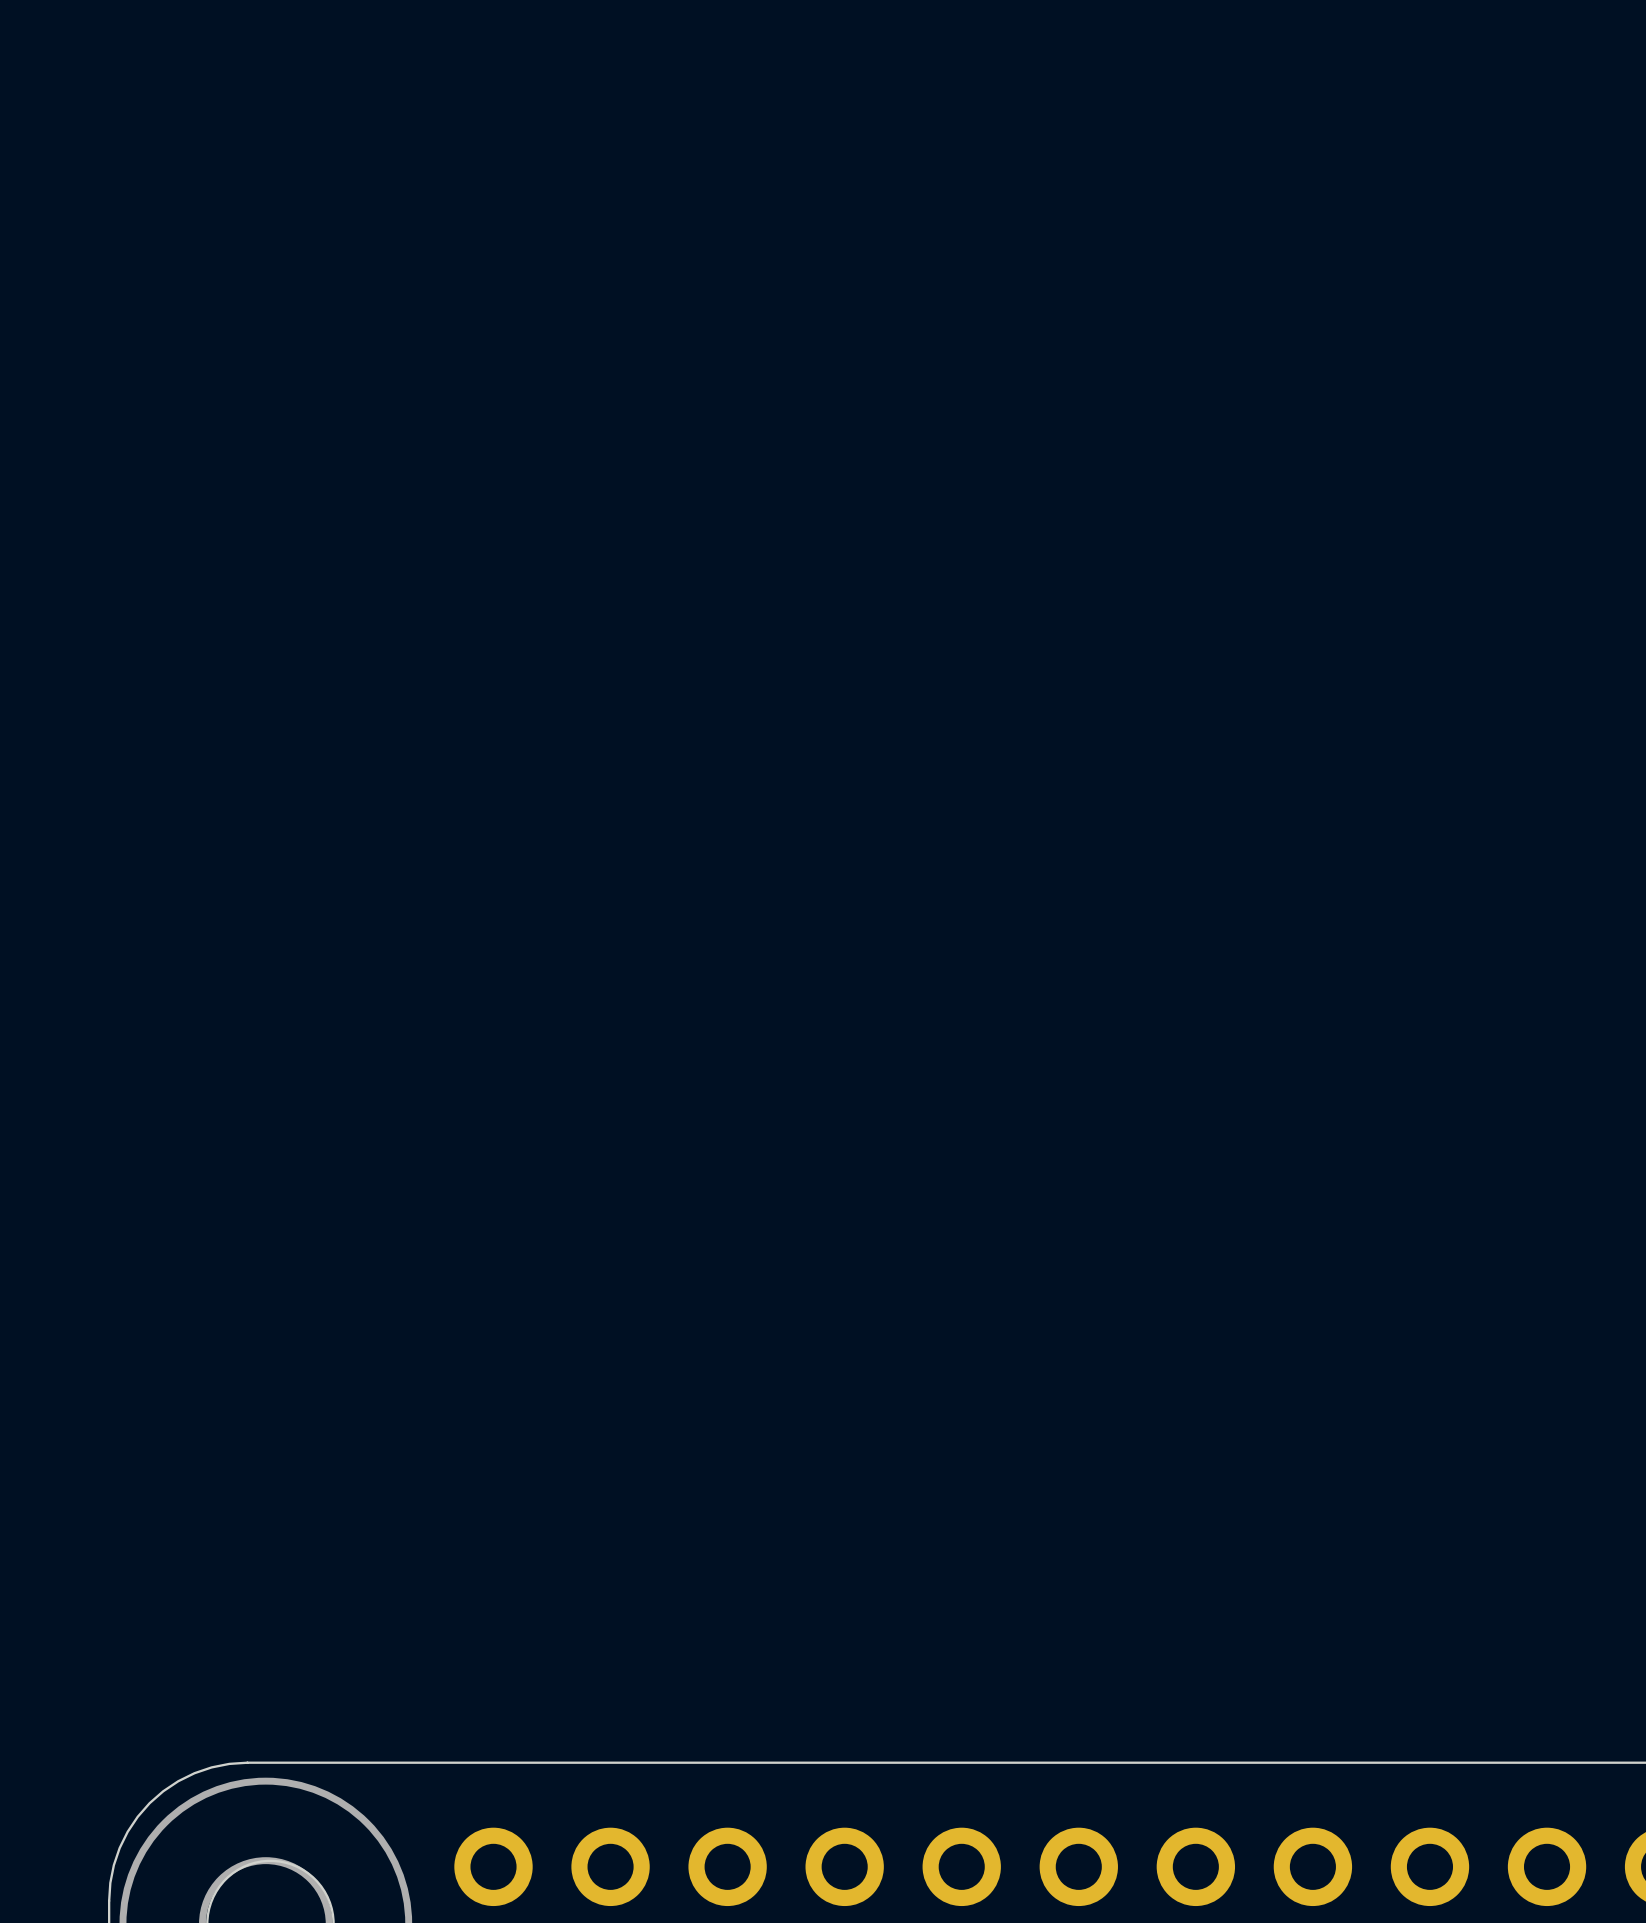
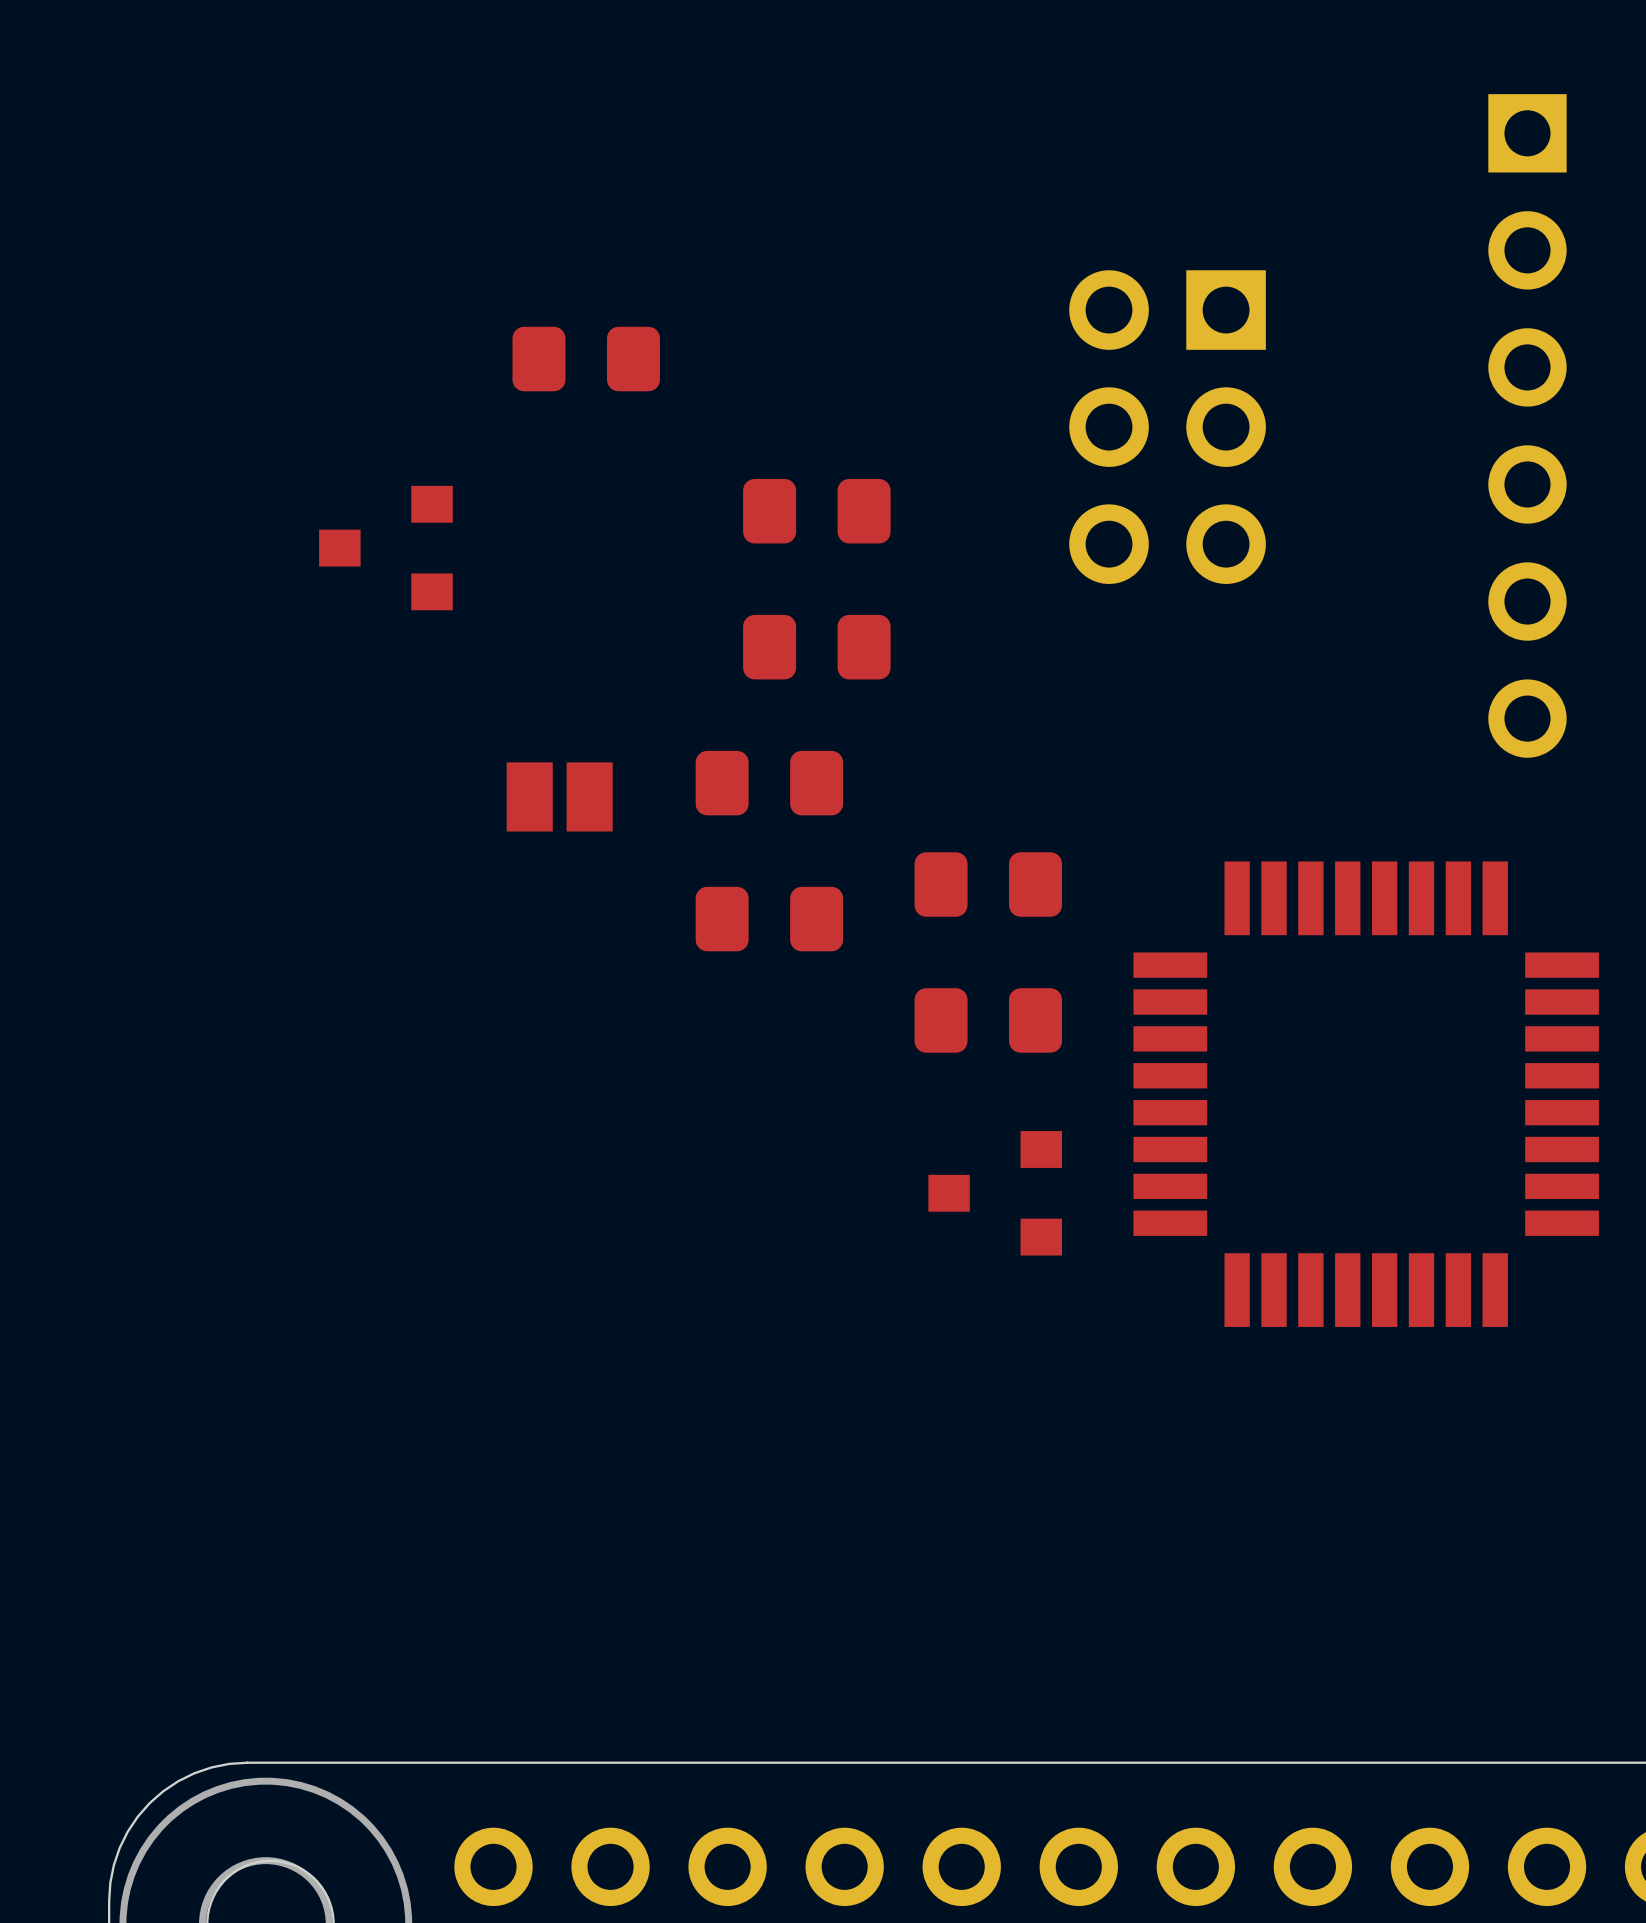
part: none -> (586, 359)
part: none -> (1527, 425)
part: none -> (1167, 427)
part: none -> (816, 511)
part: none -> (385, 548)
part: none -> (816, 647)
part: none -> (769, 783)
part: none -> (559, 796)
part: none -> (988, 884)
part: none -> (769, 919)
part: none -> (988, 1020)
part: none -> (1366, 1094)
part: none -> (995, 1193)

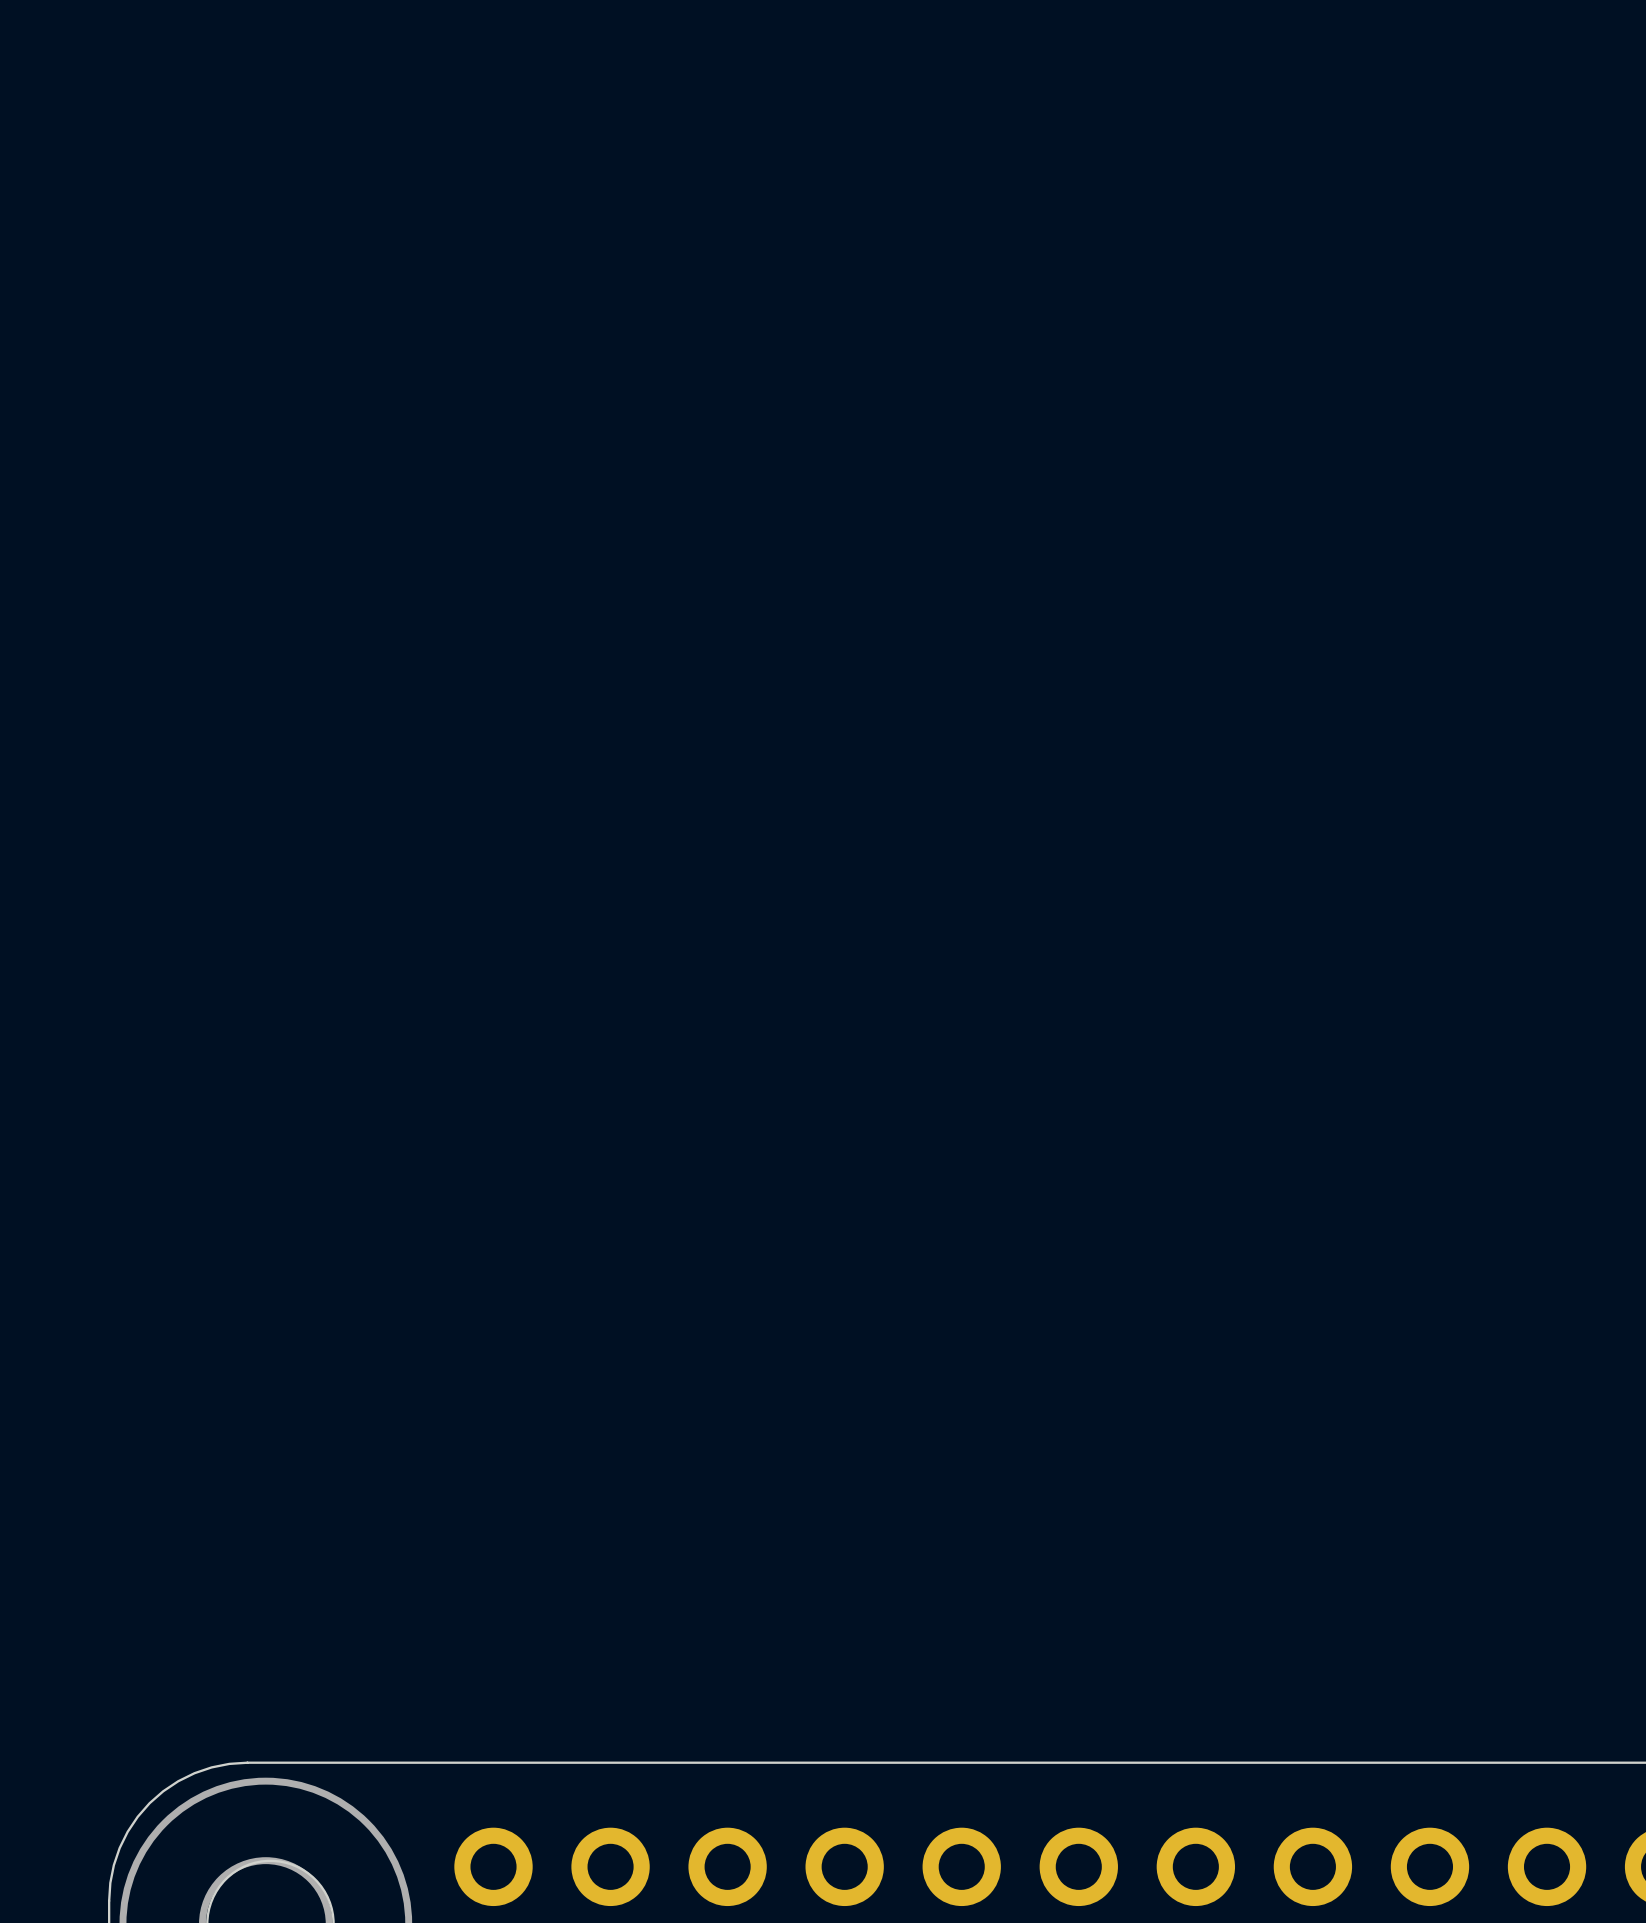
part: (586, 359) -> none
part: (1527, 425) -> none
part: (1167, 427) -> none
part: (816, 511) -> none
part: (385, 548) -> none
part: (816, 647) -> none
part: (769, 783) -> none
part: (559, 796) -> none
part: (988, 884) -> none
part: (769, 919) -> none
part: (988, 1020) -> none
part: (1366, 1094) -> none
part: (995, 1193) -> none

